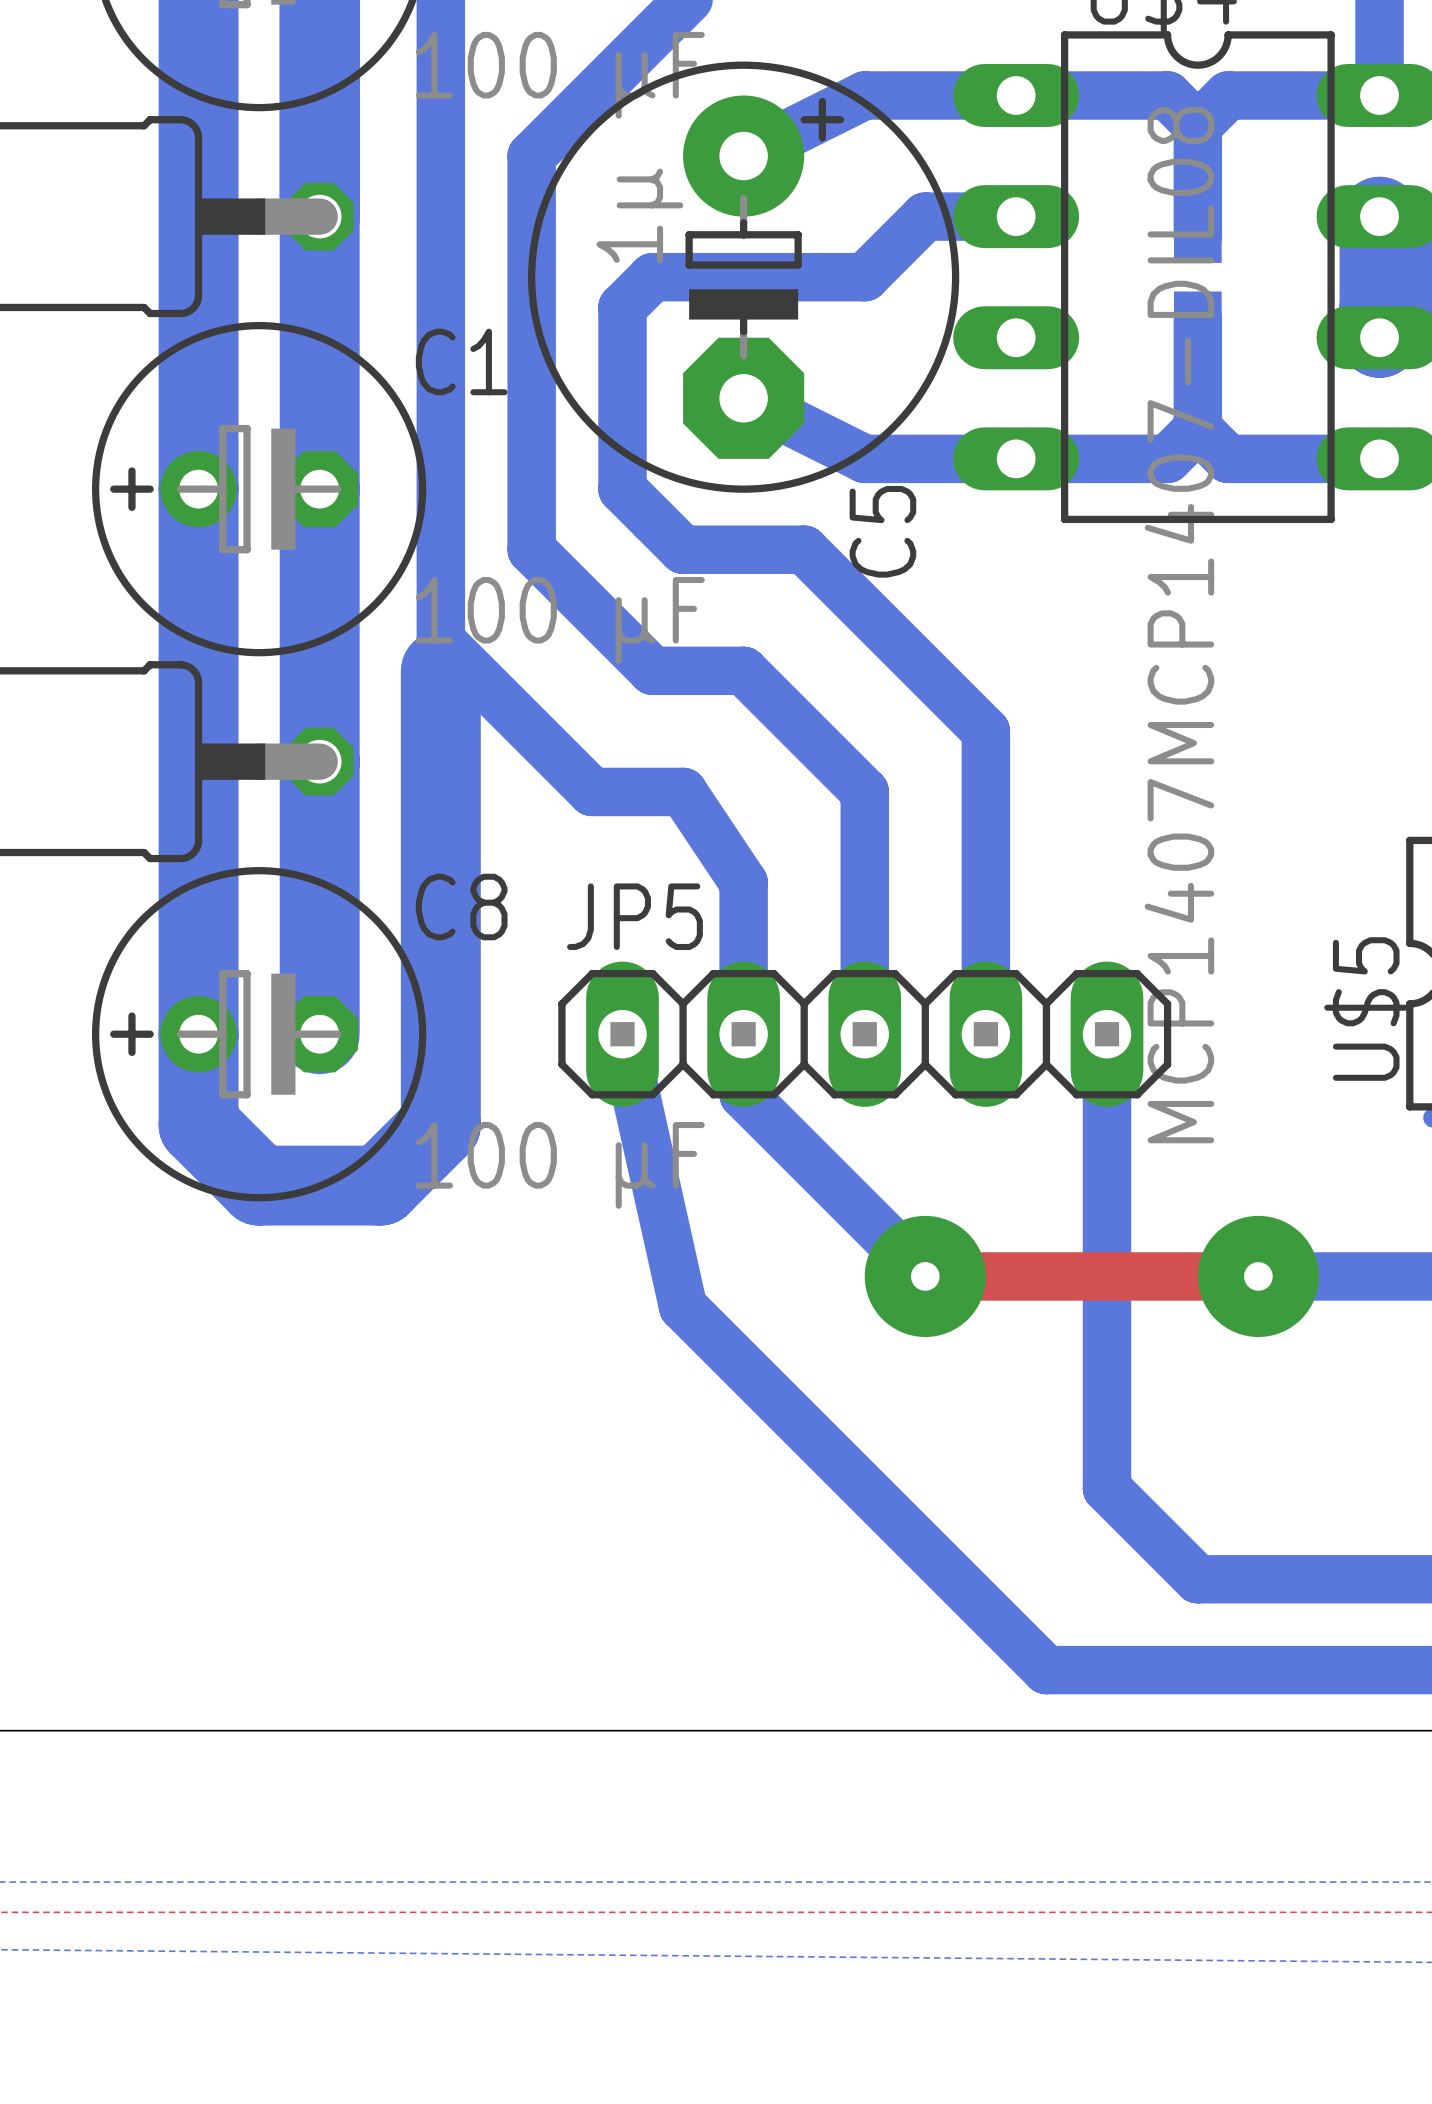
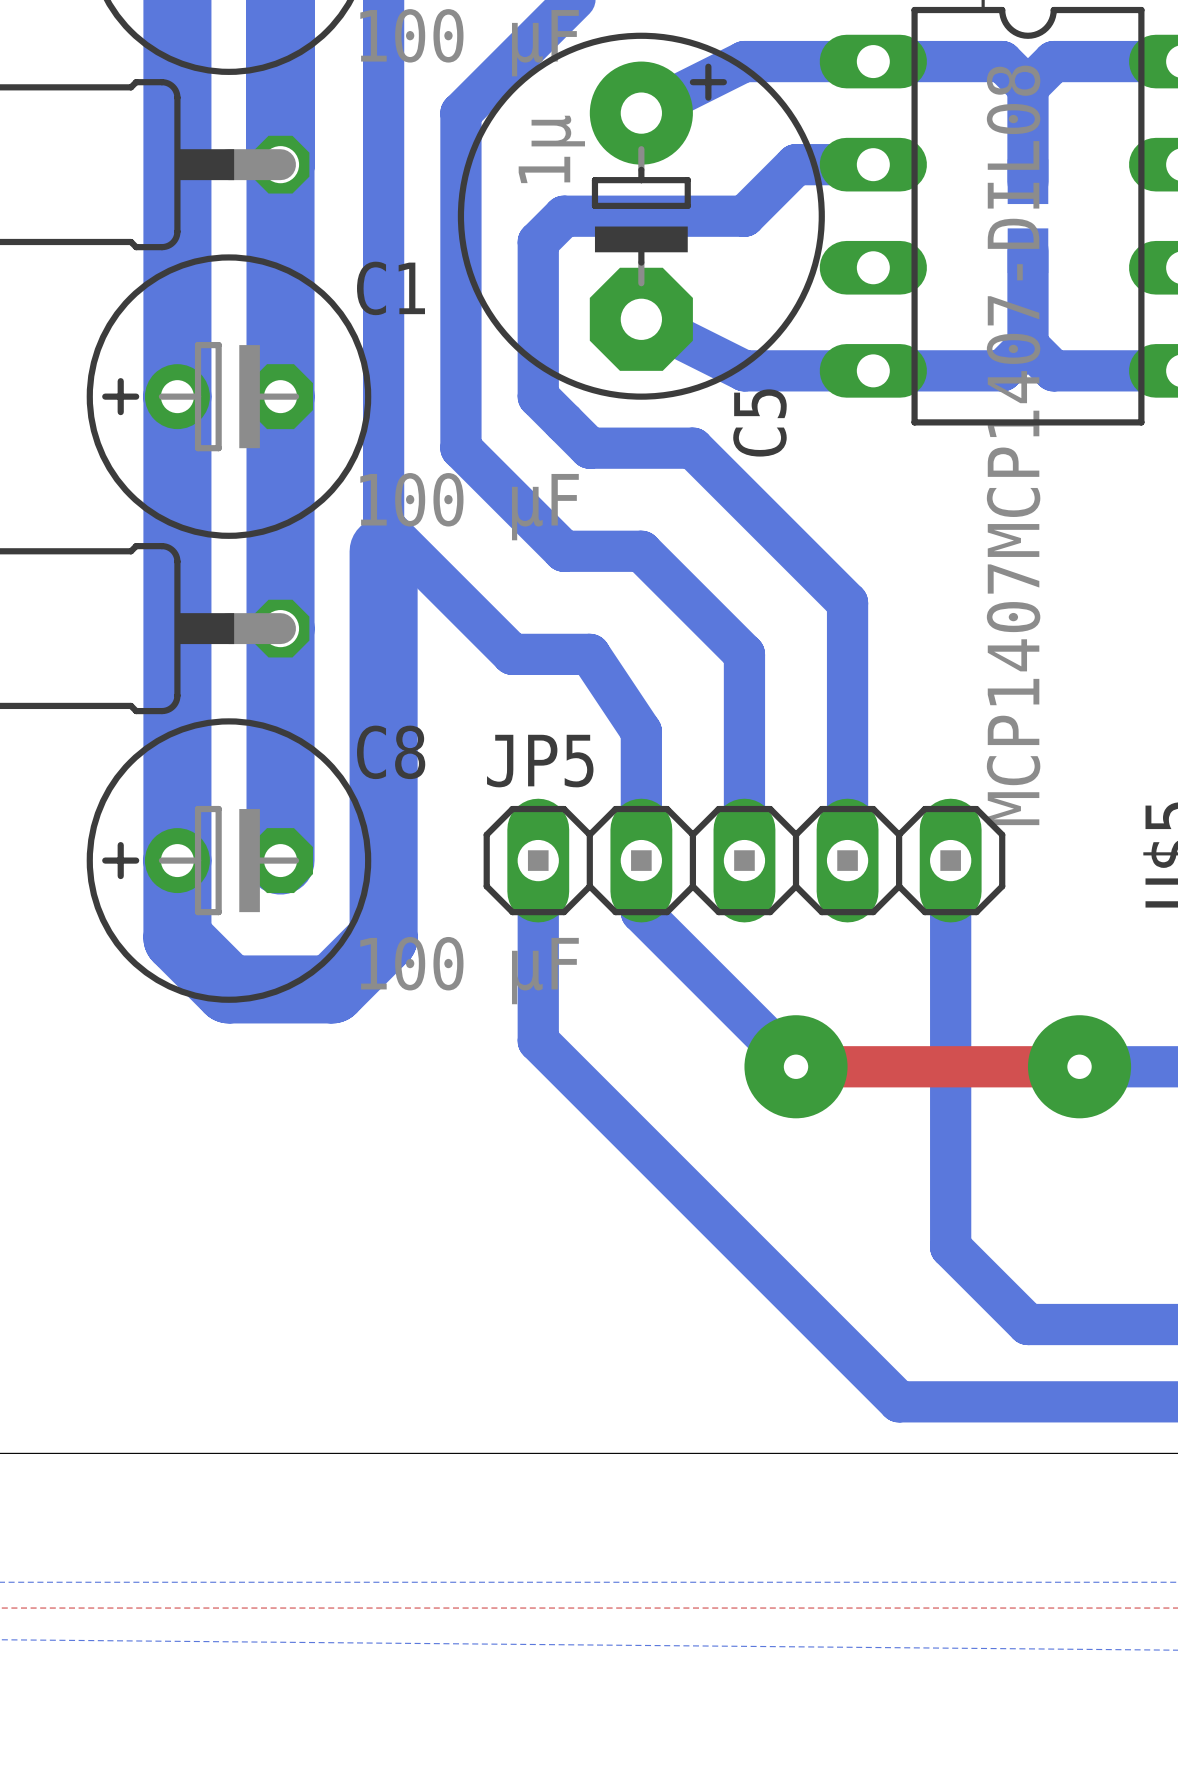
bottom track: (622, 1034) (683, 1306) -> (538, 860) (538, 1040) (589, 1092)

